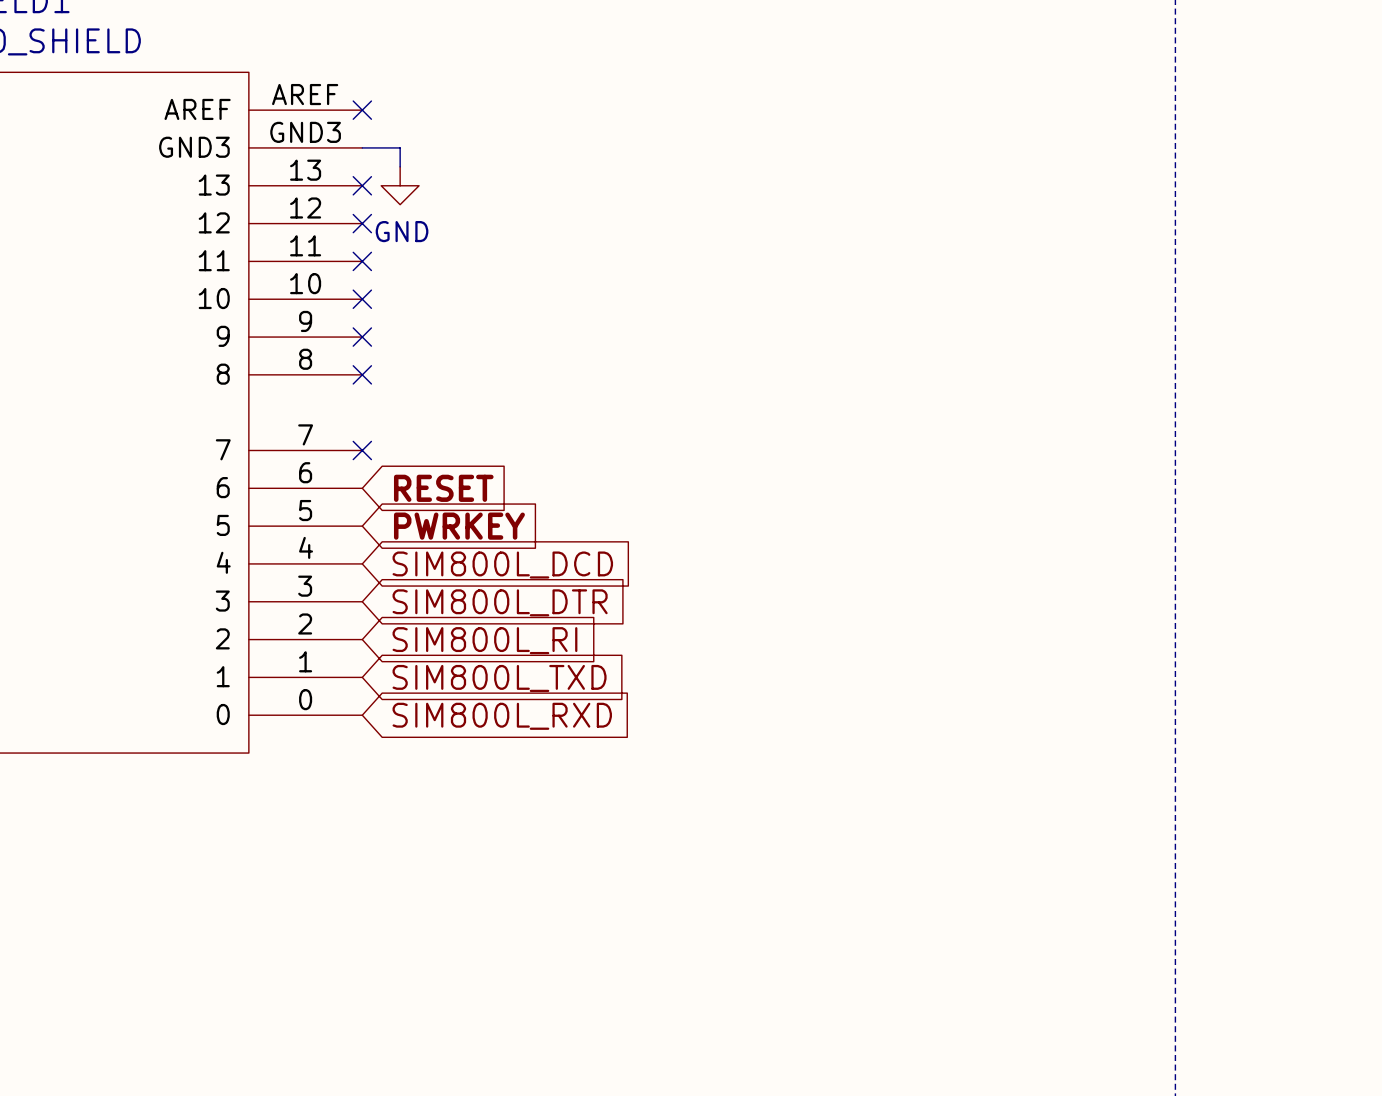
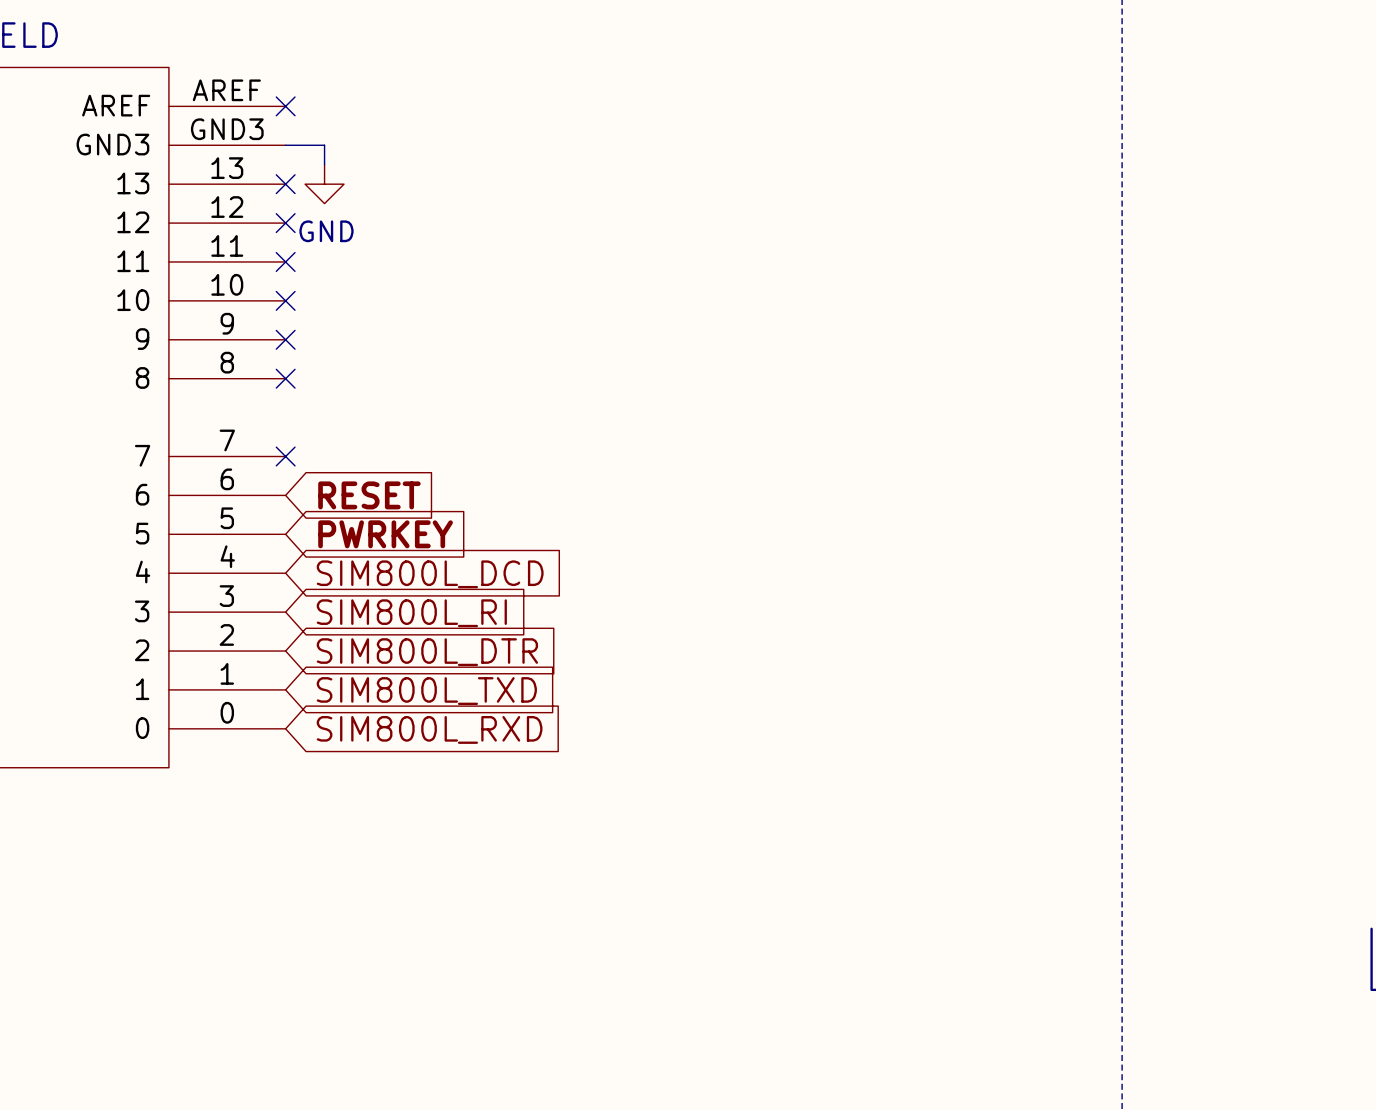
global label: SIM800L_DTR (500, 602) -> SIM800L_RI (411, 613)
global label: SIM800L_RI (484, 640) -> SIM800L_DTR (427, 652)

